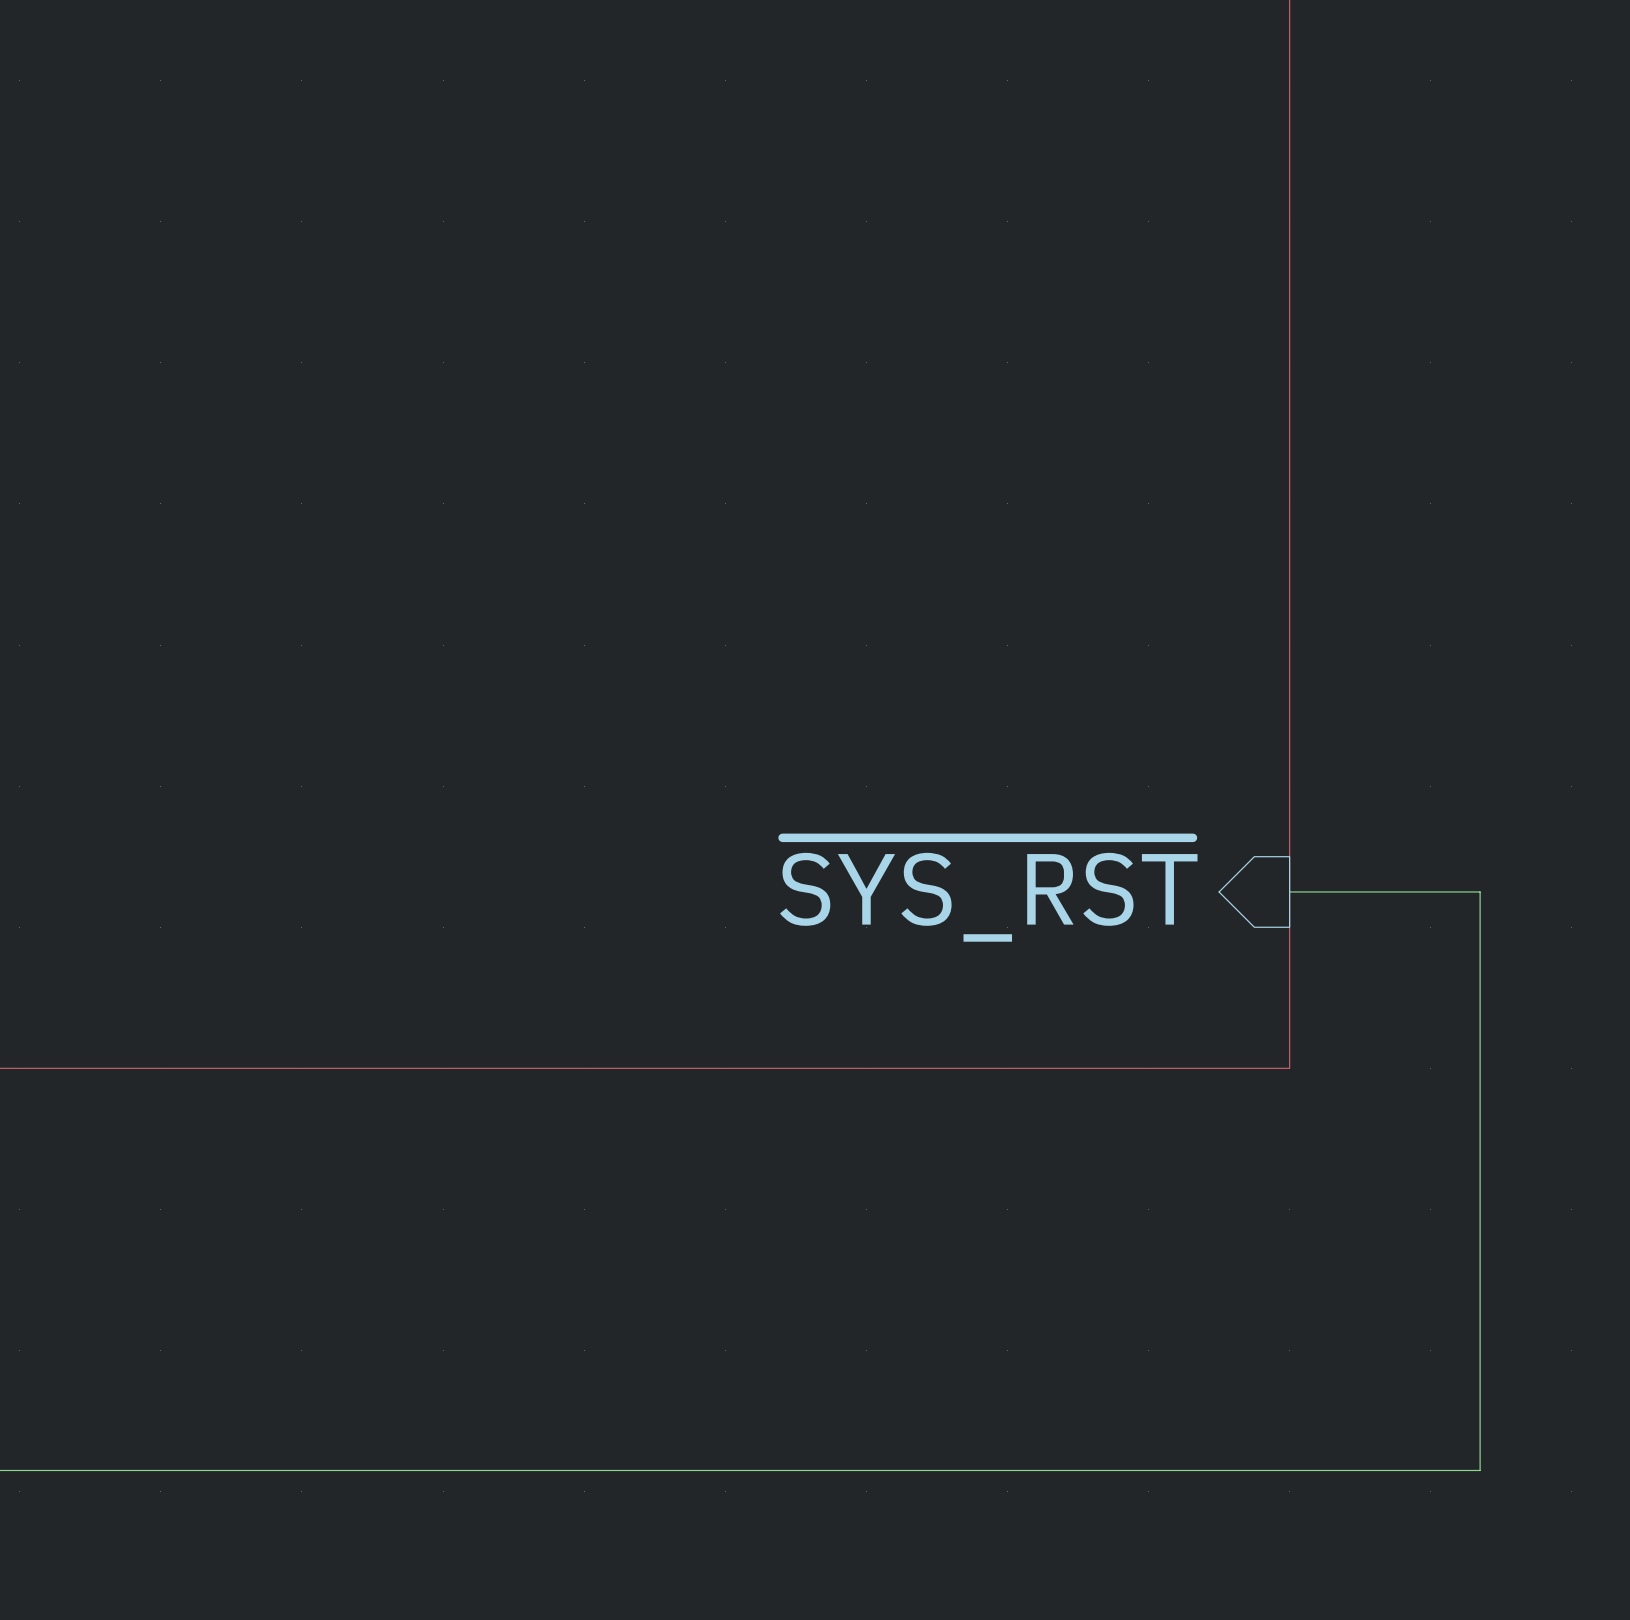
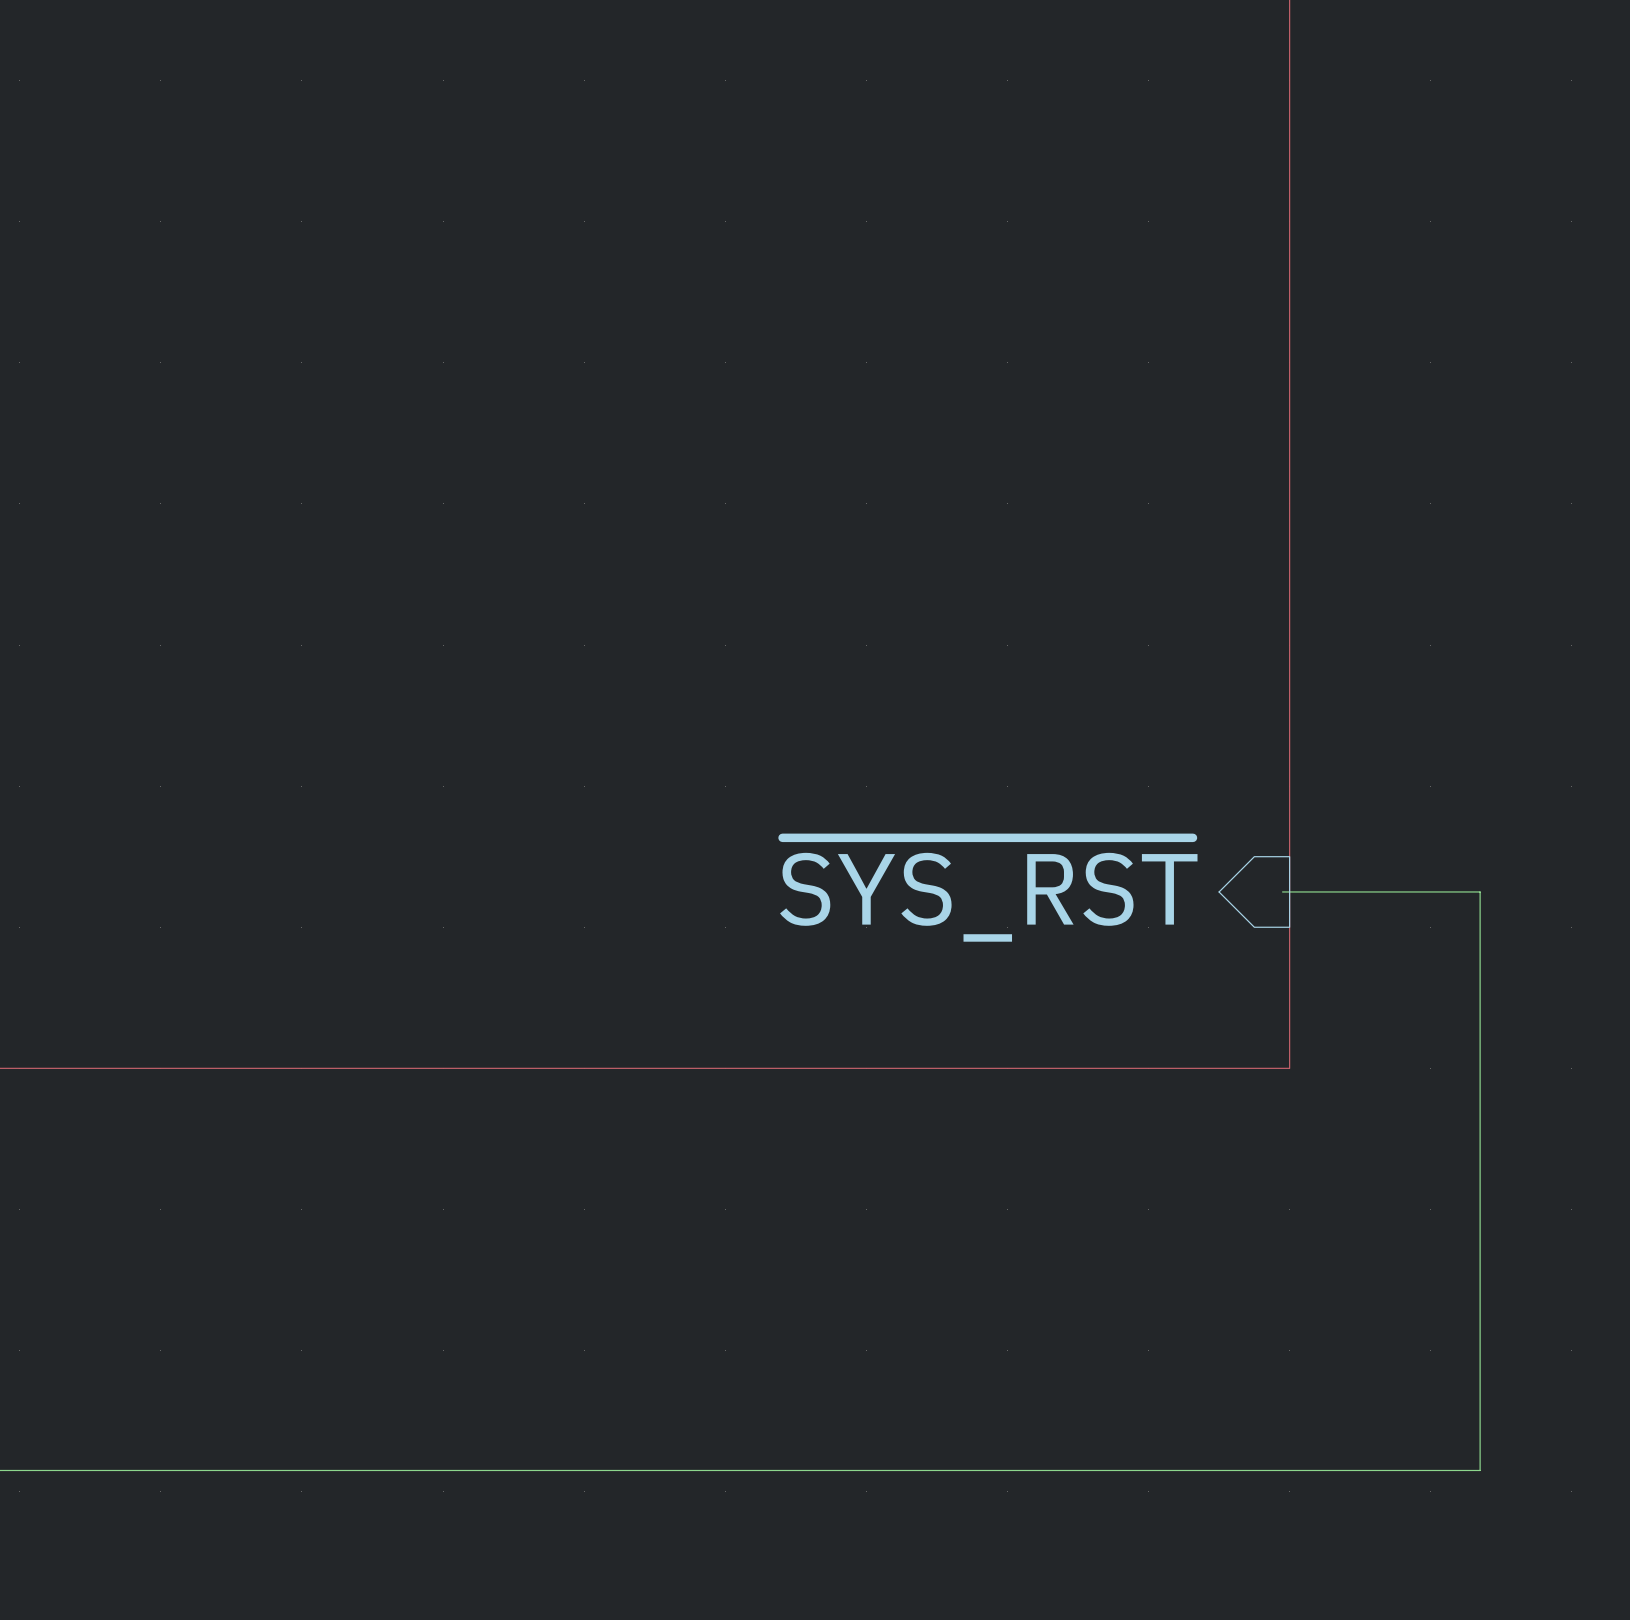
wire: none -> (1282, 891) (1289, 891)

